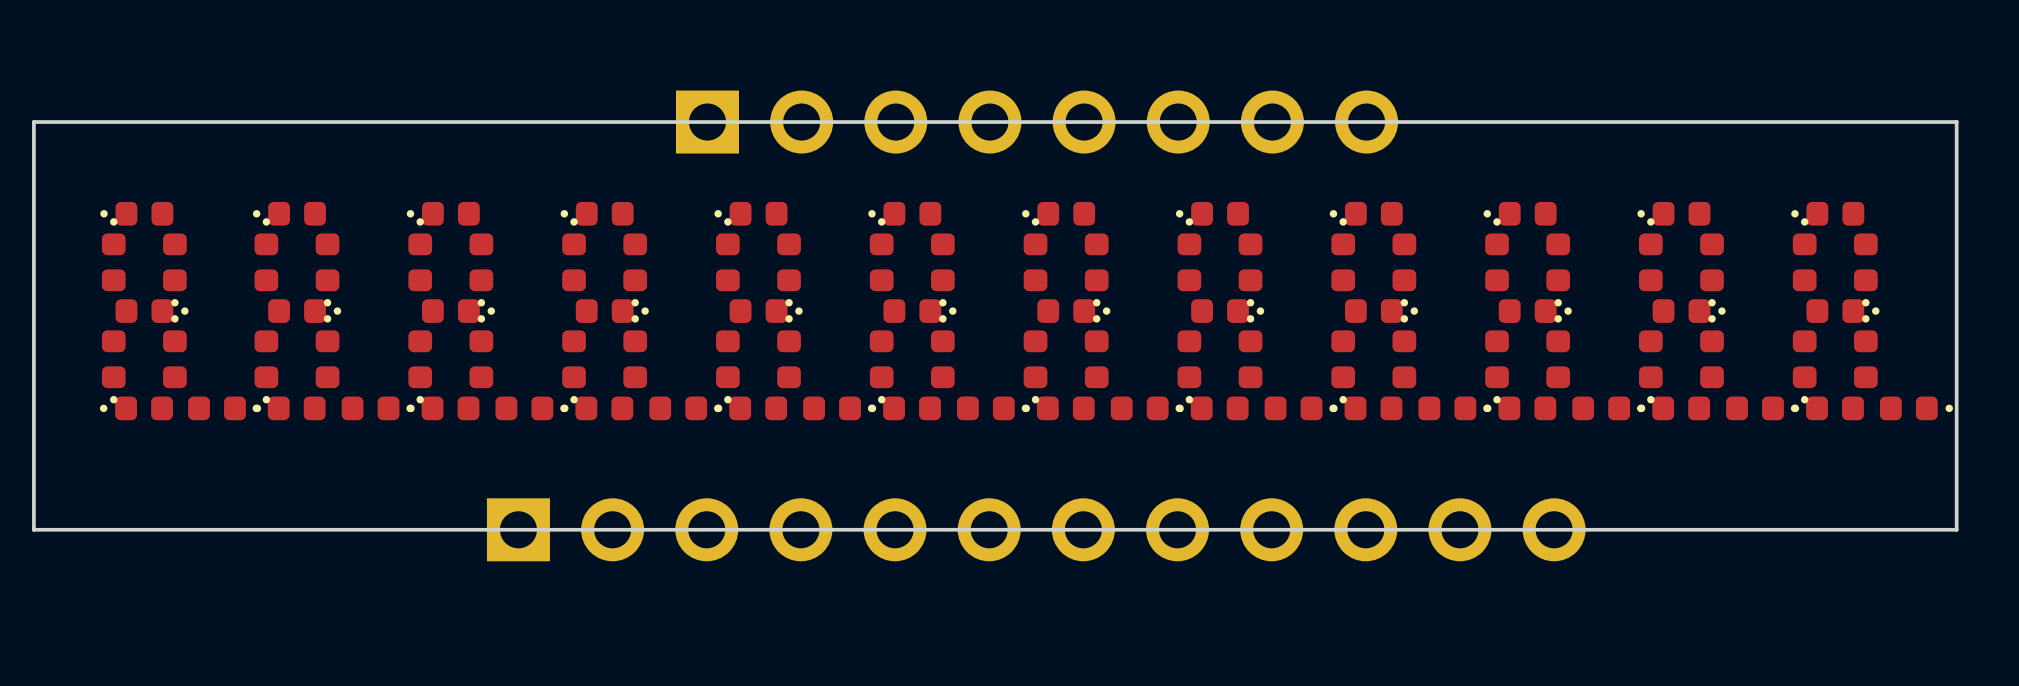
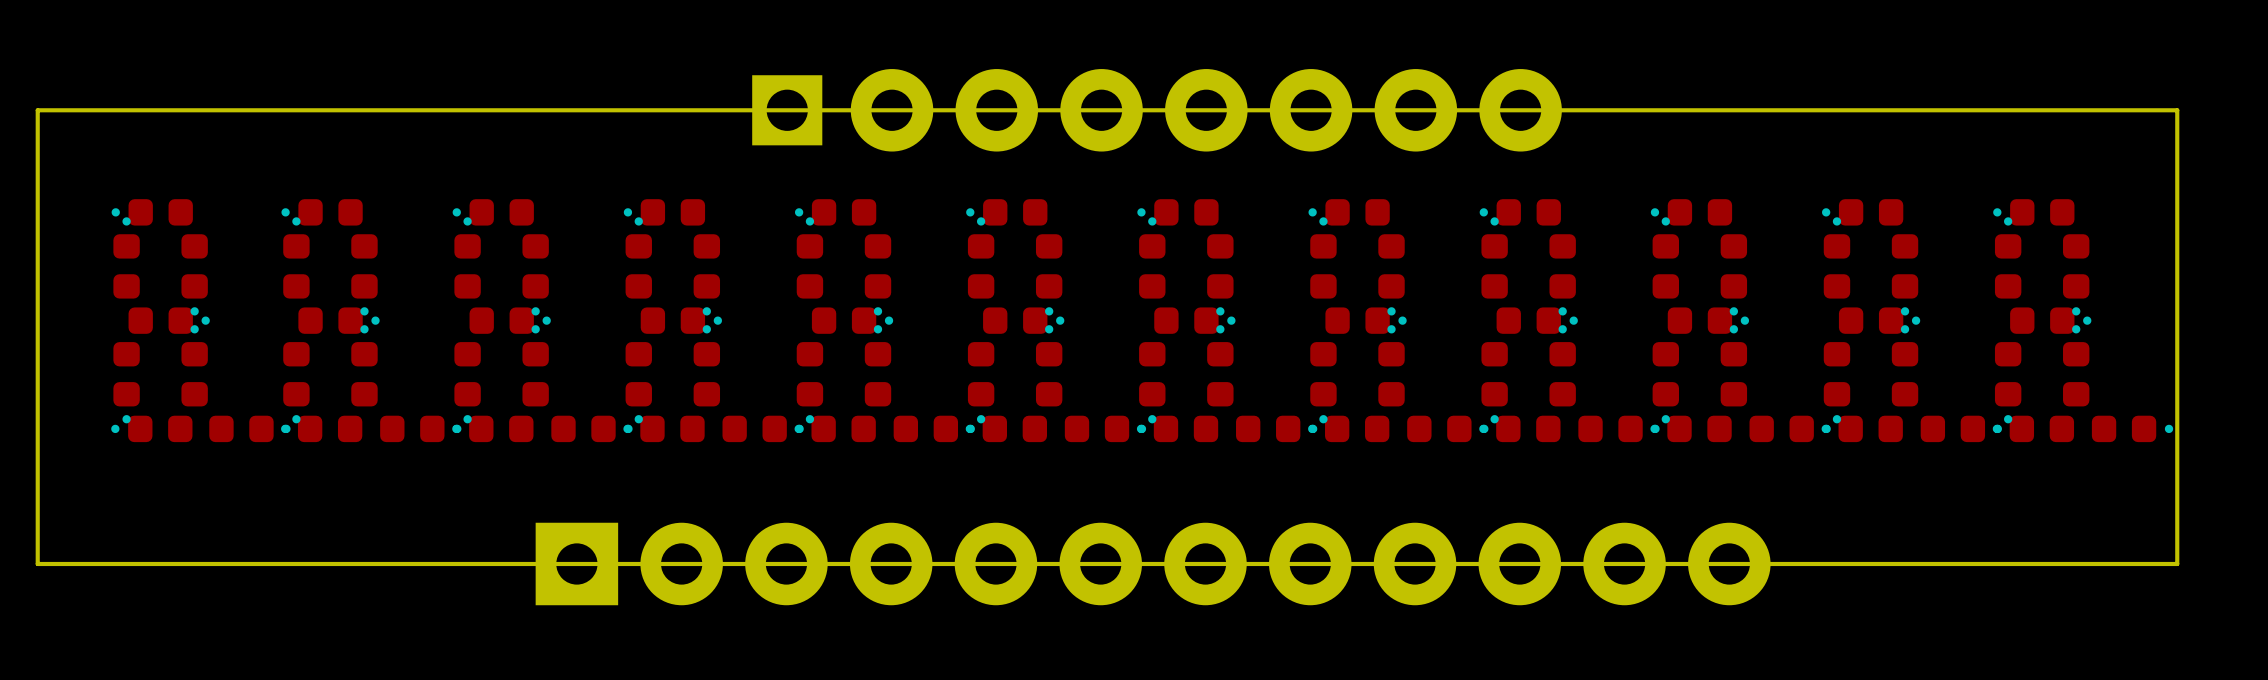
part footprint: [675, 90, 1399, 154] -> [752, 69, 1562, 152]
part footprint: [486, 498, 1586, 562] -> [535, 522, 1771, 606]

